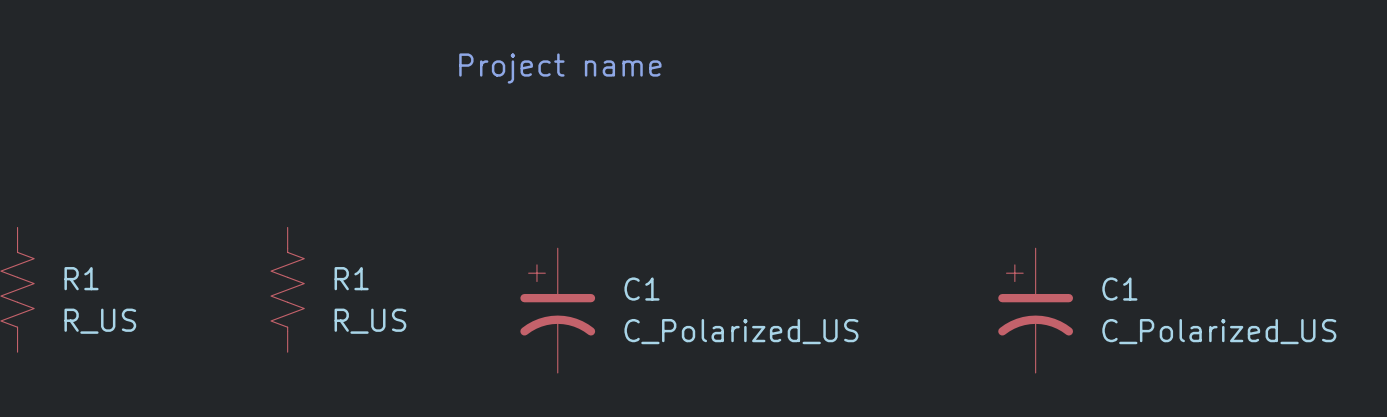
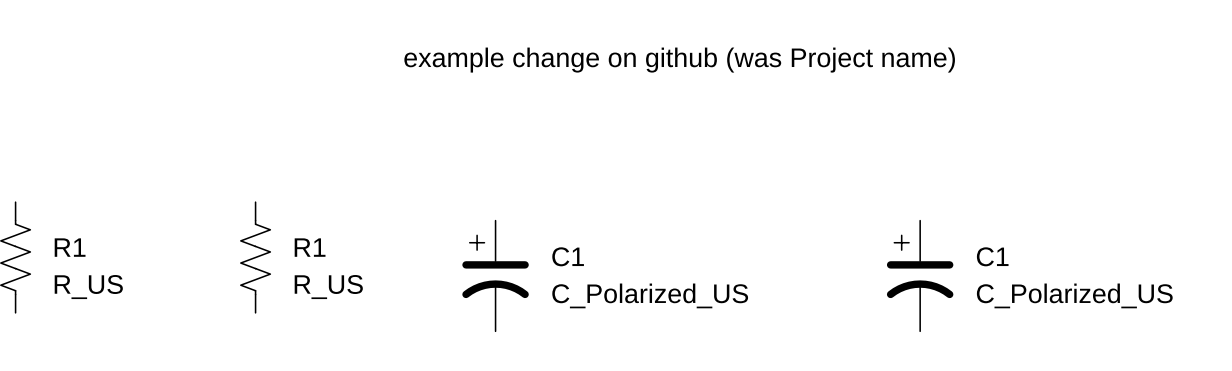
text: Project name (560, 68) -> example change on github (was Project name) (679, 60)

